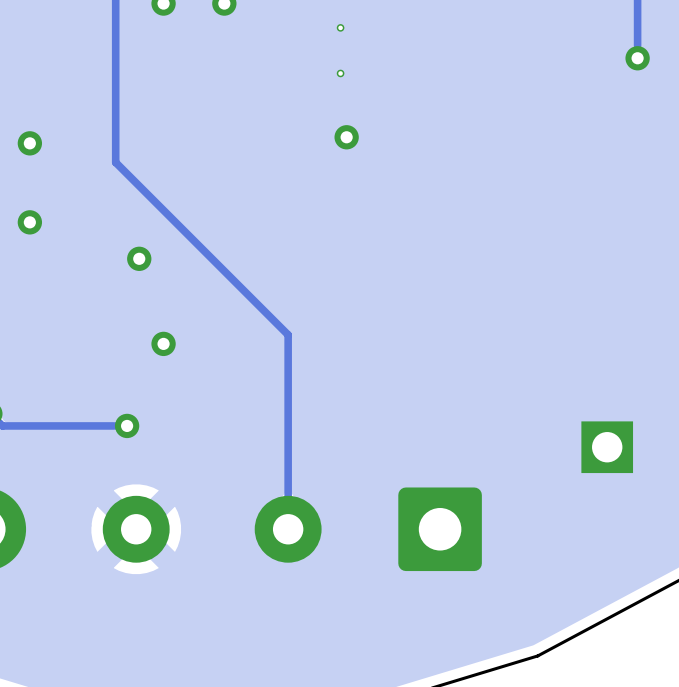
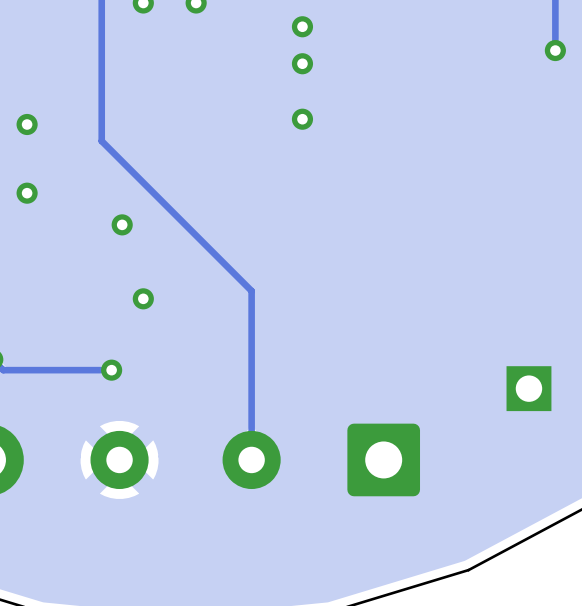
via size: [336, 24, 345, 32] -> [291, 16, 314, 38]
via size: [336, 69, 345, 78] -> [291, 53, 314, 75]

